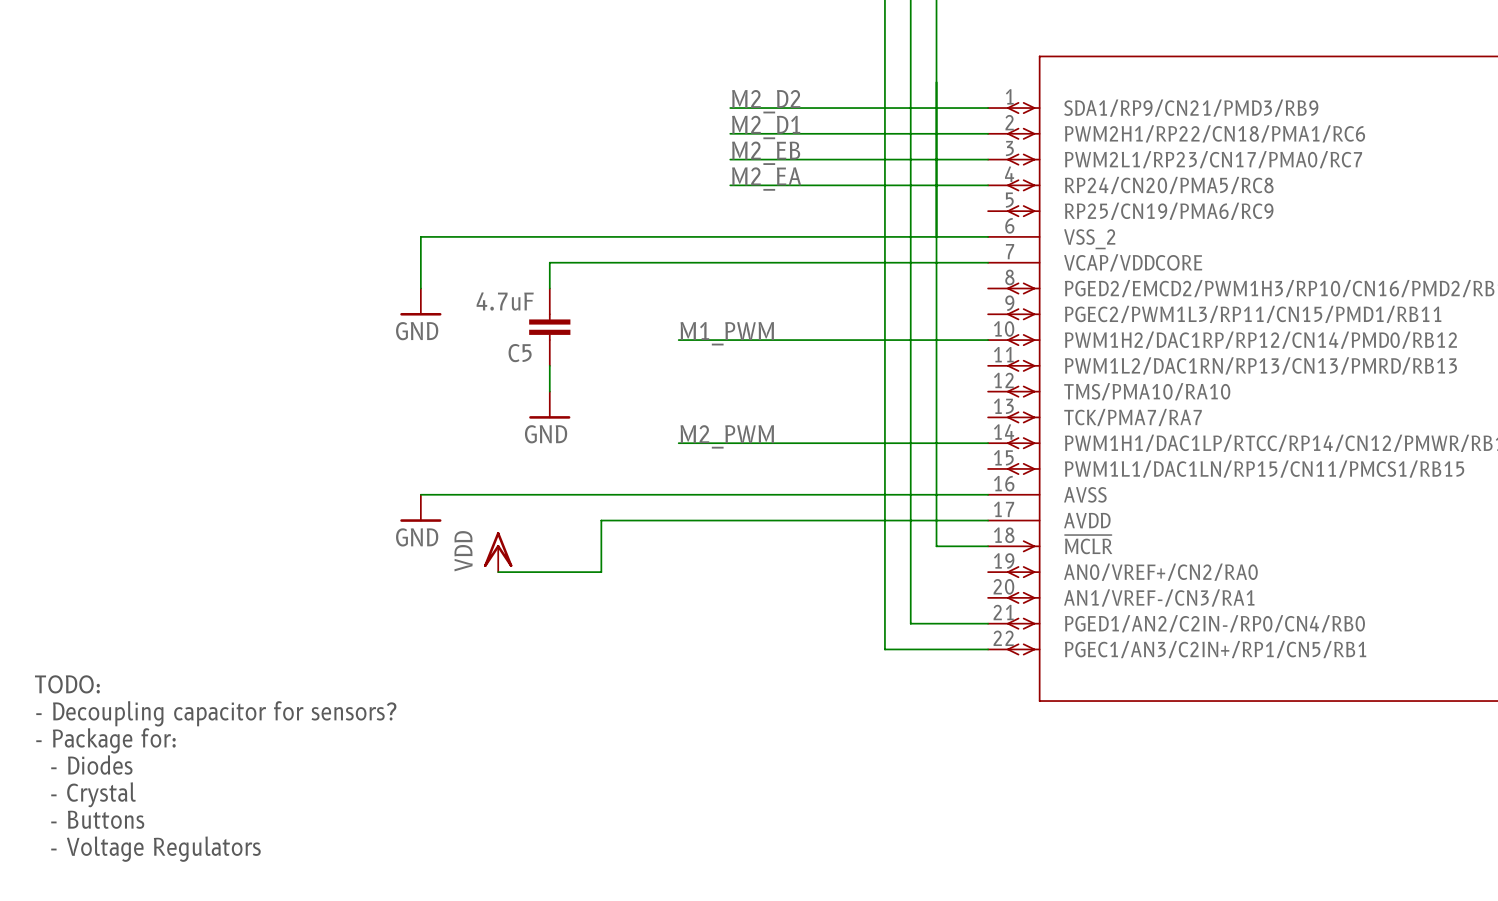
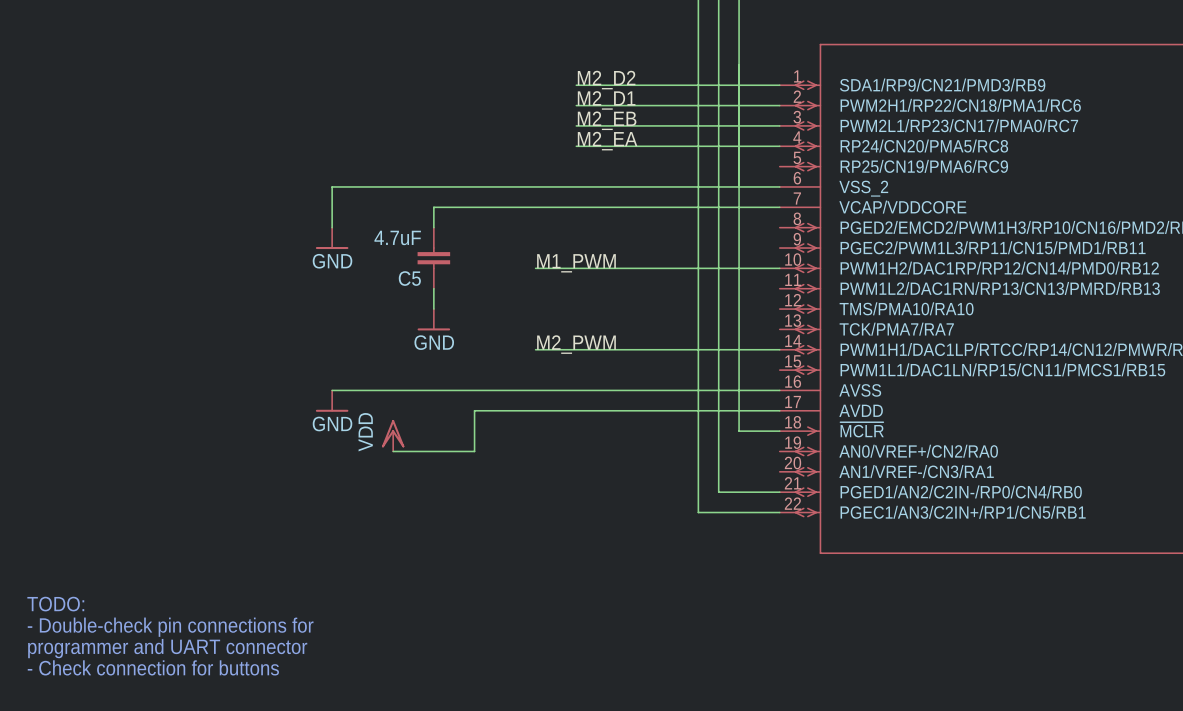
text: TODO: (67, 684) -> none
text: - Decoupling capacitor for sensors? (216, 713) -> none
text: - Package for: (105, 740) -> none
text: - Diodes (91, 764) -> TODO: (55, 604)
text: - Crystal (93, 794) -> - Double-check pin connections for (170, 627)
text: - Buttons (97, 819) -> programmer and UART connector (167, 648)
text: - Voltage Regulators (155, 849) -> - Check connection for buttons (153, 667)

